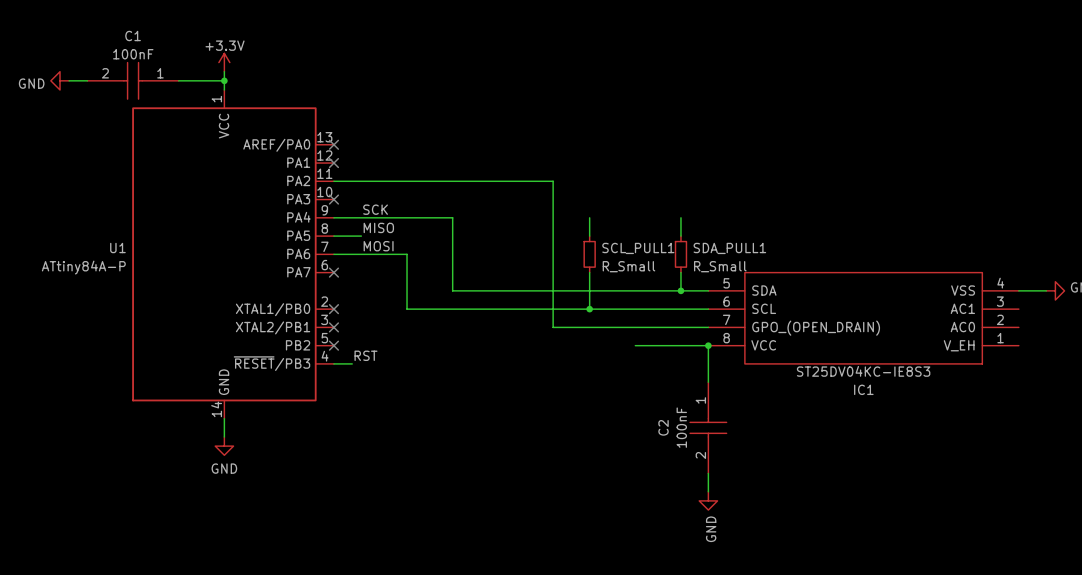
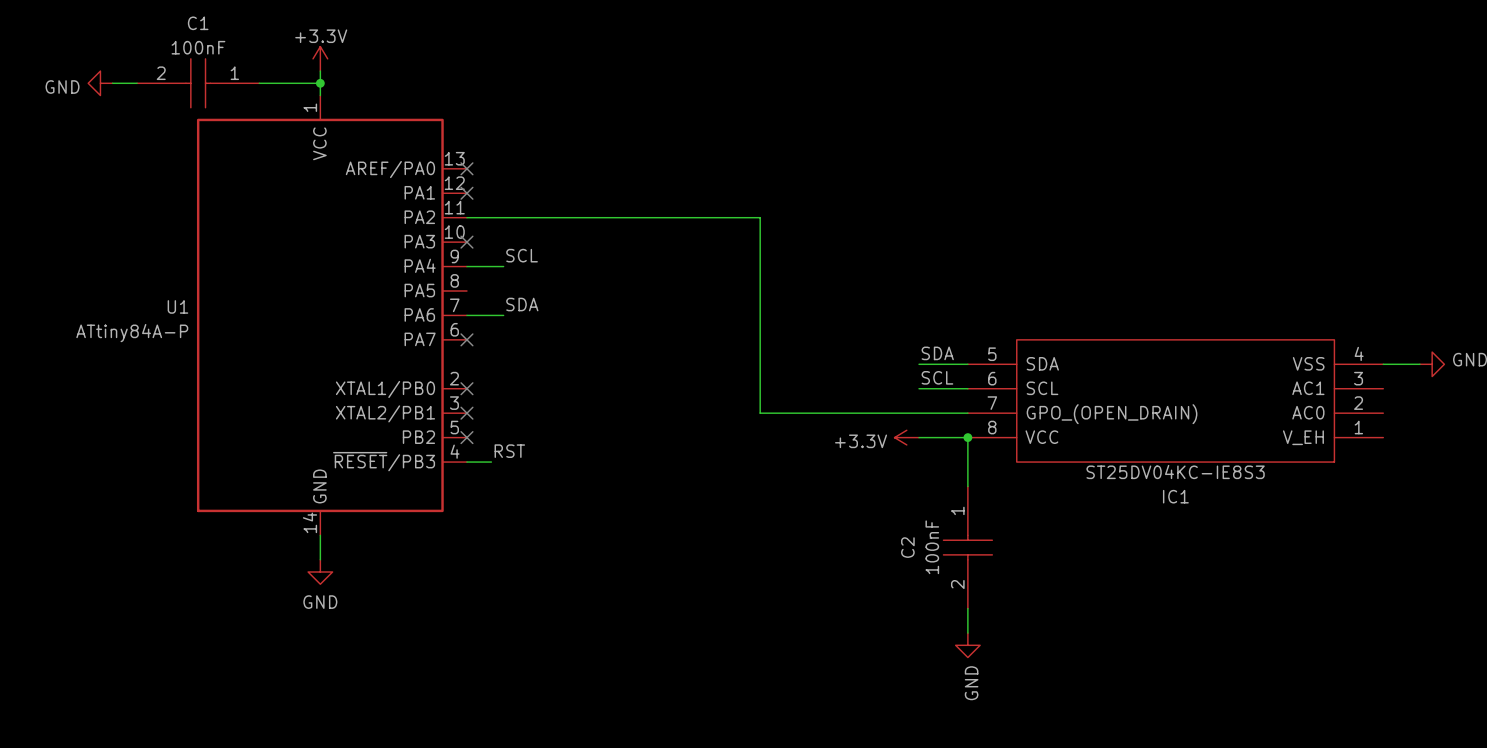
label: SCK (375, 209) -> SCL (522, 255)
wire: (361, 217) (452, 217) (452, 290) (671, 290) -> none
wire: (589, 217) (589, 236) -> none
wire: (680, 217) (680, 236) -> none
label: MISO (378, 227) -> none
wire: (333, 236) (361, 236) -> none
label: MOSI (378, 246) -> SDA (522, 304)
wire: (361, 254) (407, 254) (407, 309) (671, 309) -> none
SCL_PULL1: R_Small (589, 254) -> none
SDA_PULL1: R_Small (680, 254) -> none
wire: (589, 272) (589, 309) -> none
wire: (680, 272) (680, 290) -> none
label: none -> SDA (937, 353)
junction: (680, 290) -> none
label: none -> SCL (937, 377)
junction: (589, 309) -> none
power symbol: none -> +3.3V (906, 437)

